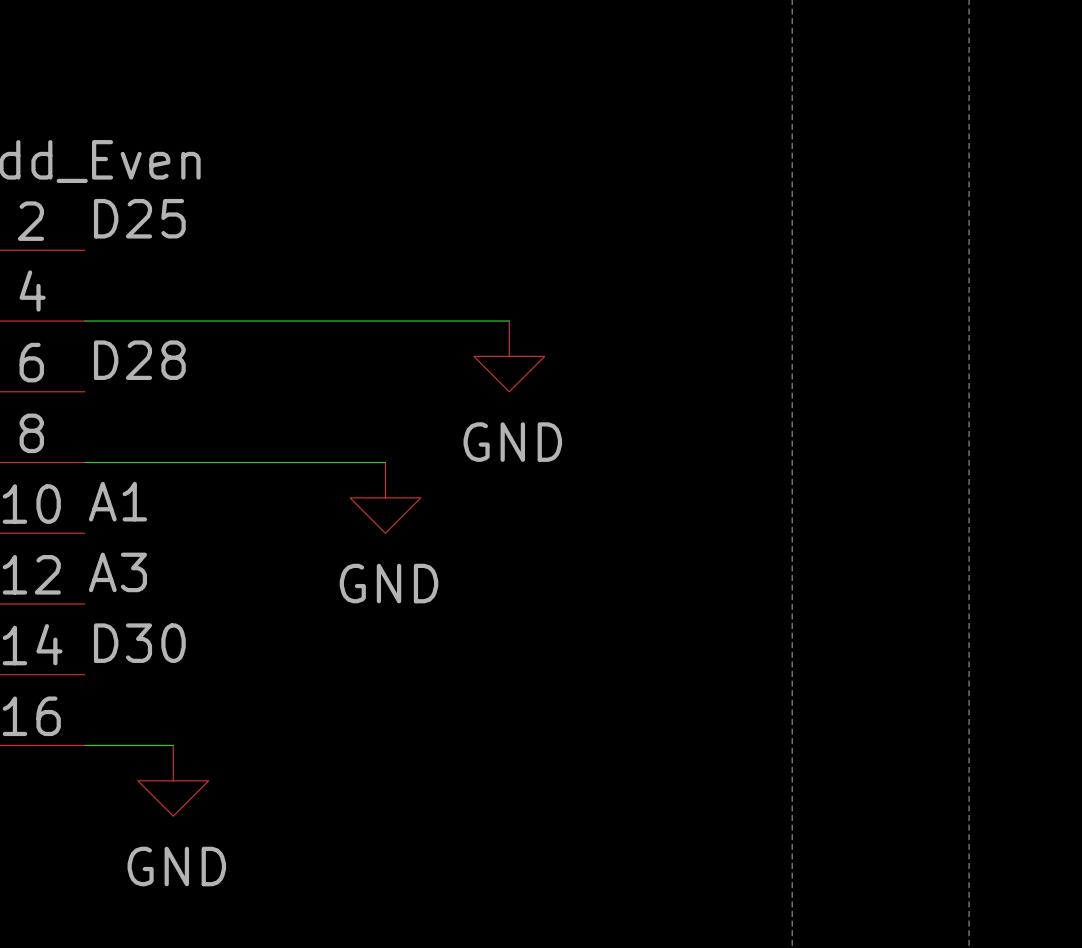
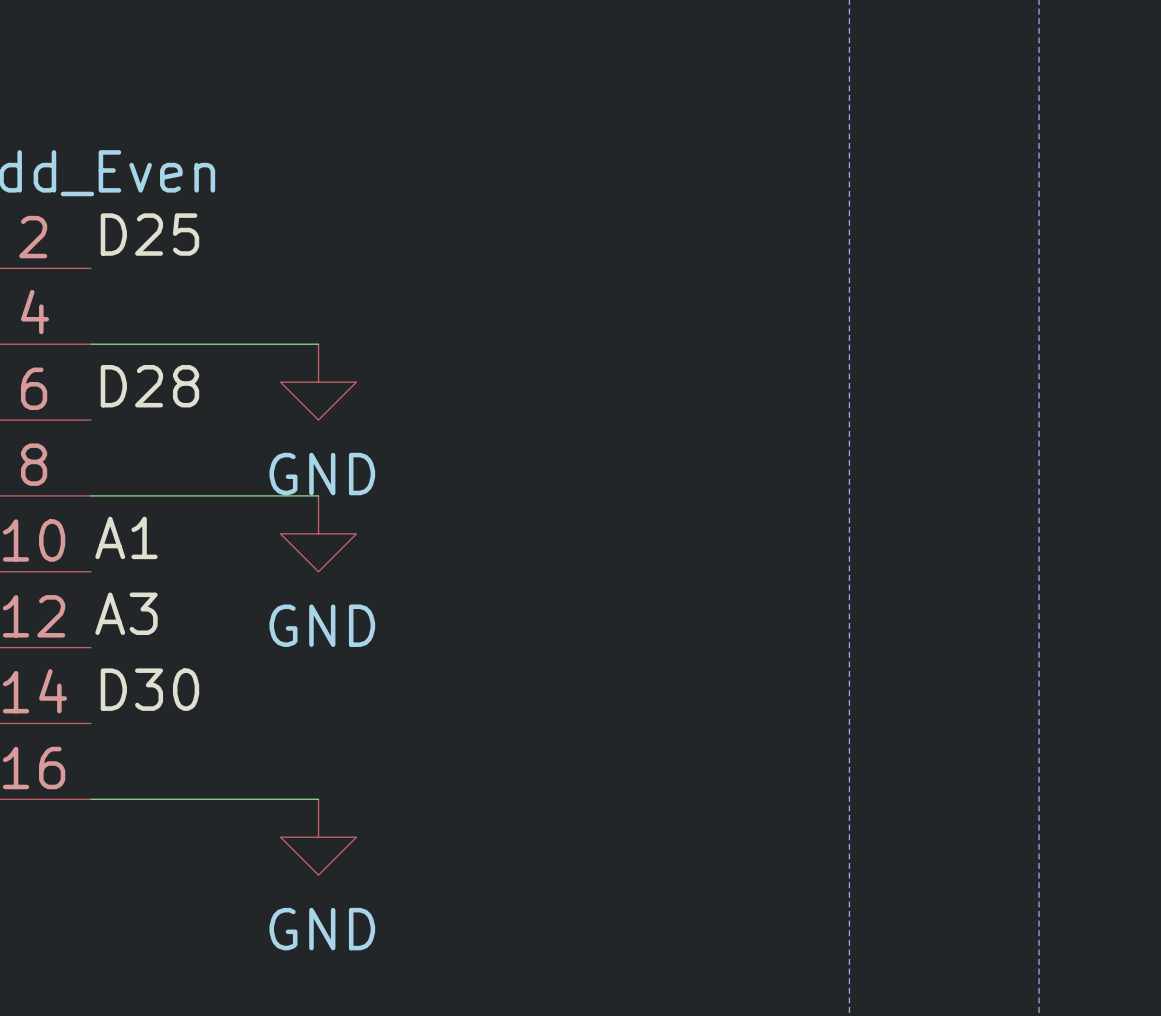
wire: (297, 321) (509, 321) -> none
power symbol: none -> GND (318, 382)
power symbol: GND (509, 356) -> none
wire: (297, 462) (385, 462) -> none
power symbol: none -> GND (318, 533)
power symbol: GND (385, 497) -> none
wire: none -> (185, 799) (318, 799)
power symbol position: GND (173, 780) -> GND (318, 837)

